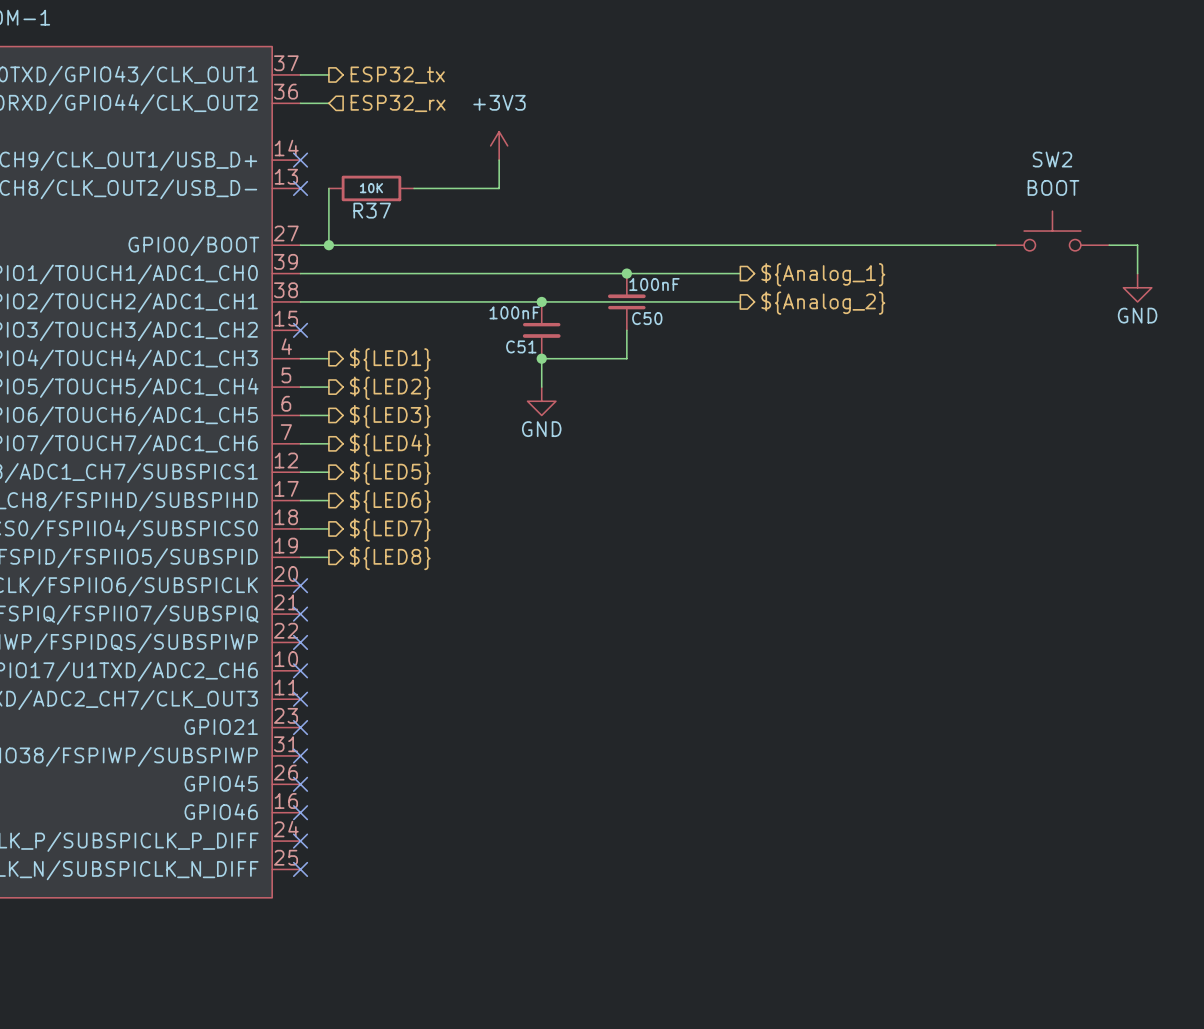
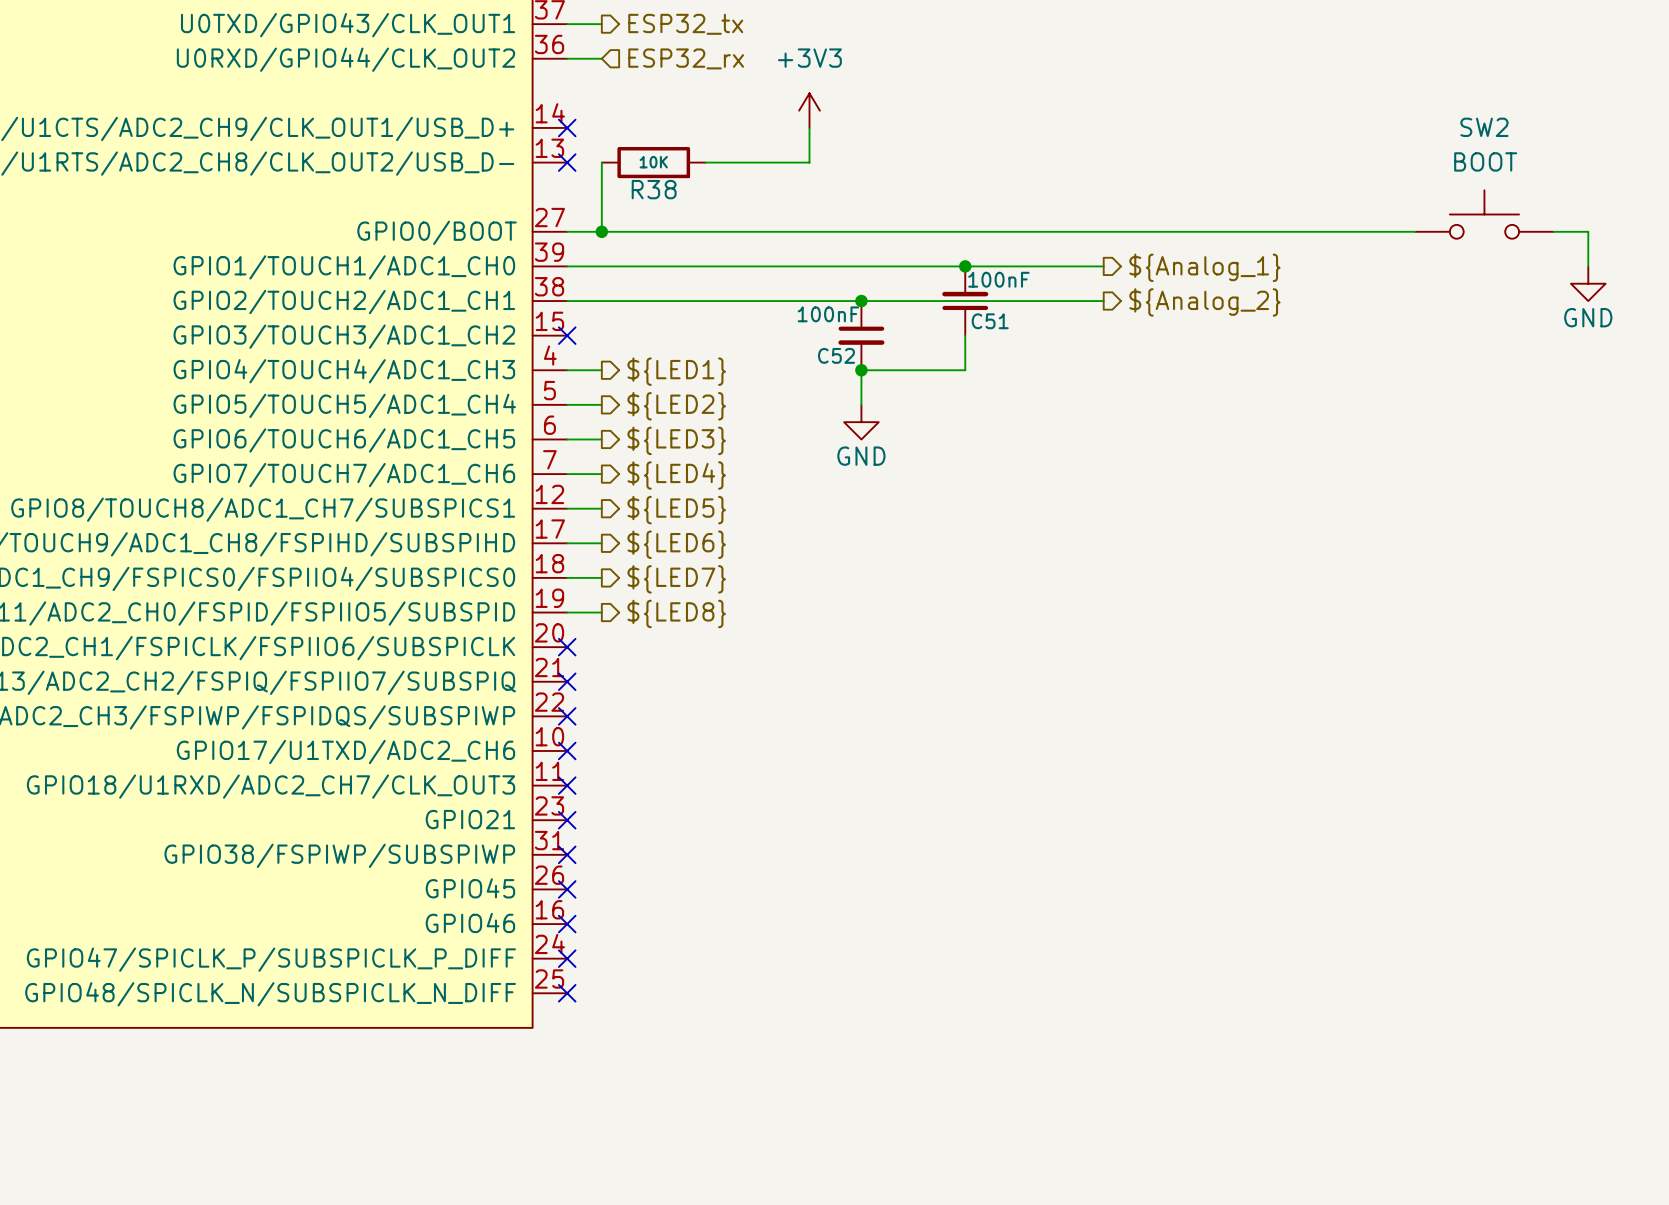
R37 name: R37 (372, 210) -> R38 (654, 189)
C50 name: C50 (647, 318) -> C51 (990, 321)
C51 name: C51 (521, 346) -> C52 (836, 355)

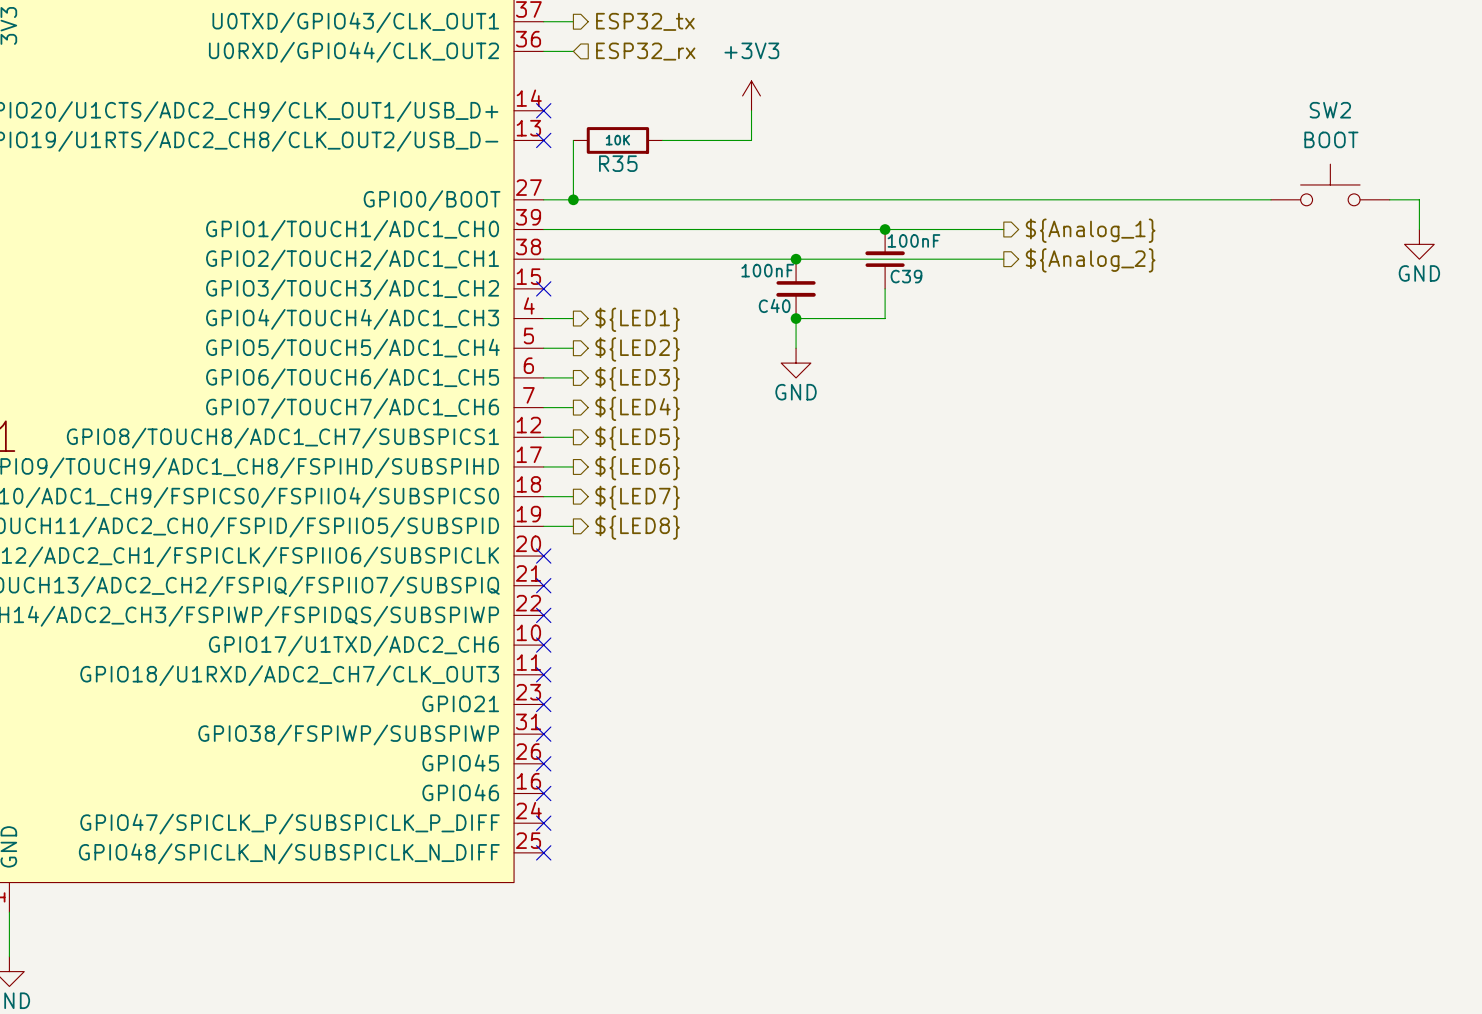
R38 name: R38 (654, 189) -> R35 (618, 163)
C51 name: C51 (990, 321) -> C39 (906, 276)
C52 name: C52 (836, 355) -> C40 (774, 305)

